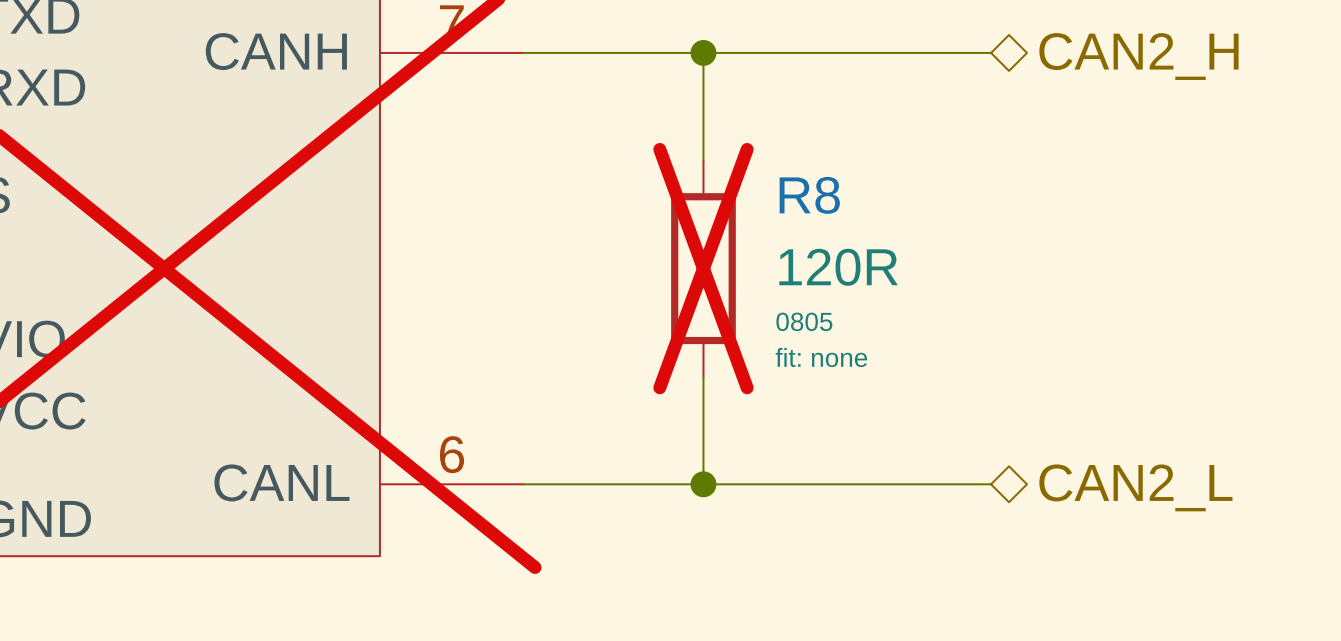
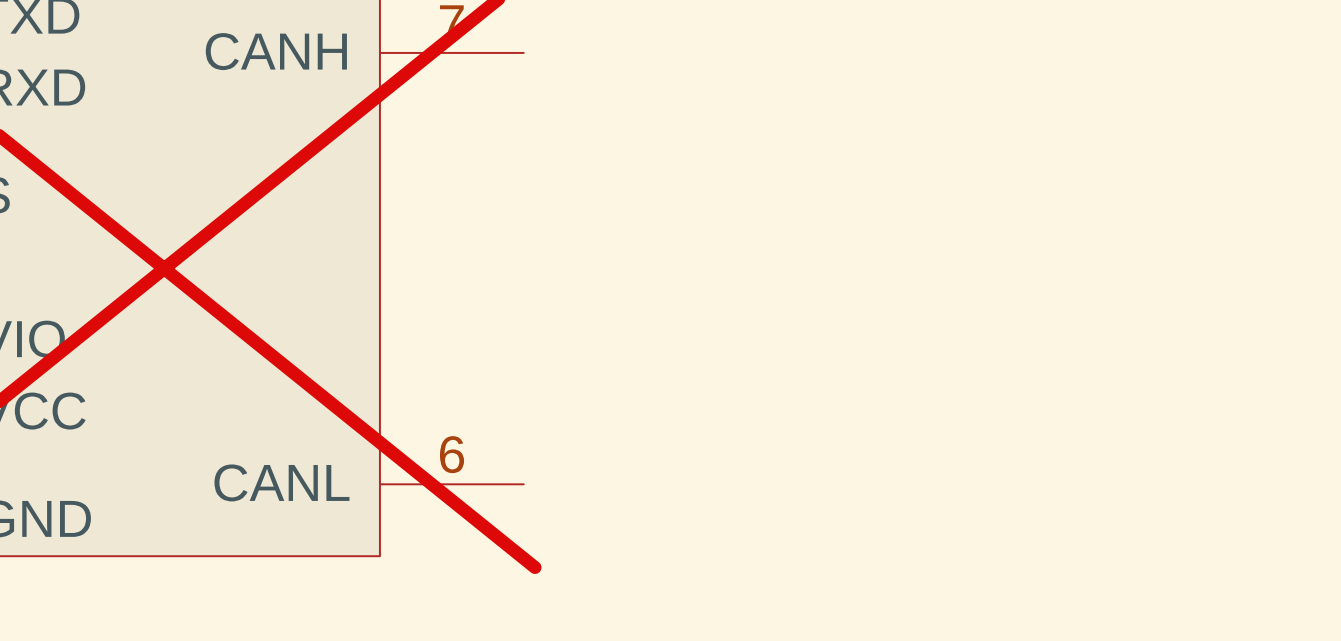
wire: (523, 52) (991, 52) -> none
wire: (703, 52) (703, 160) -> none
junction: (703, 52) -> none
hierarchical label: CAN2_H (1138, 56) -> none
R8: (703, 268) -> none
wire: (703, 376) (703, 484) -> none
wire: (523, 484) (991, 484) -> none
junction: (703, 484) -> none
hierarchical label: CAN2_L (1135, 487) -> none

